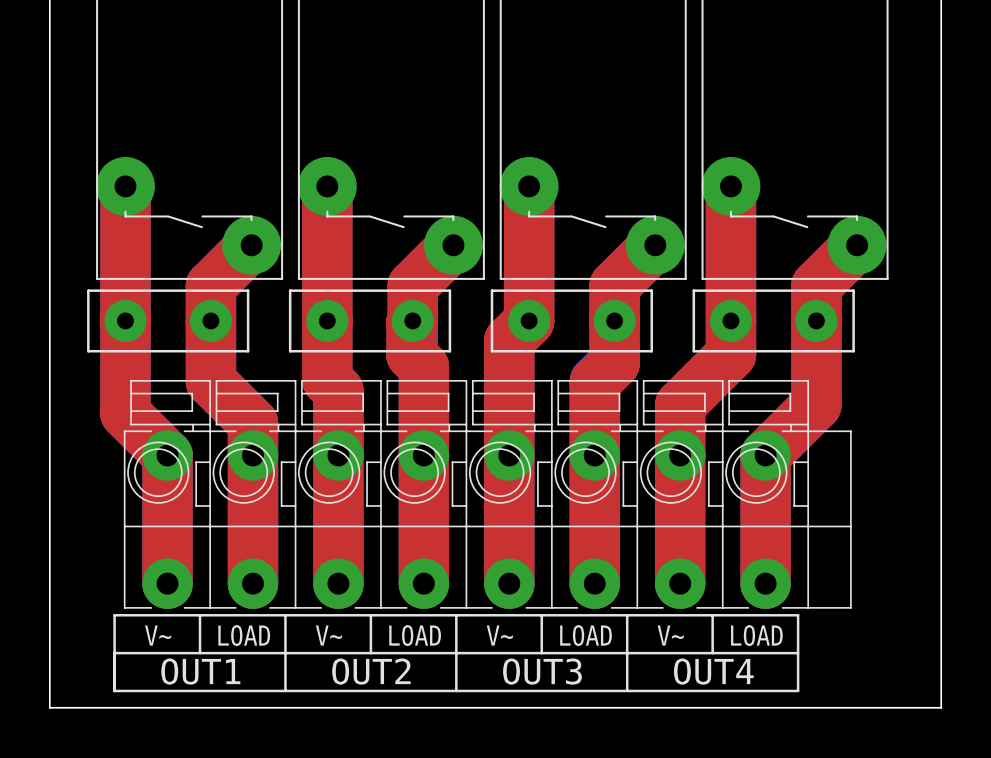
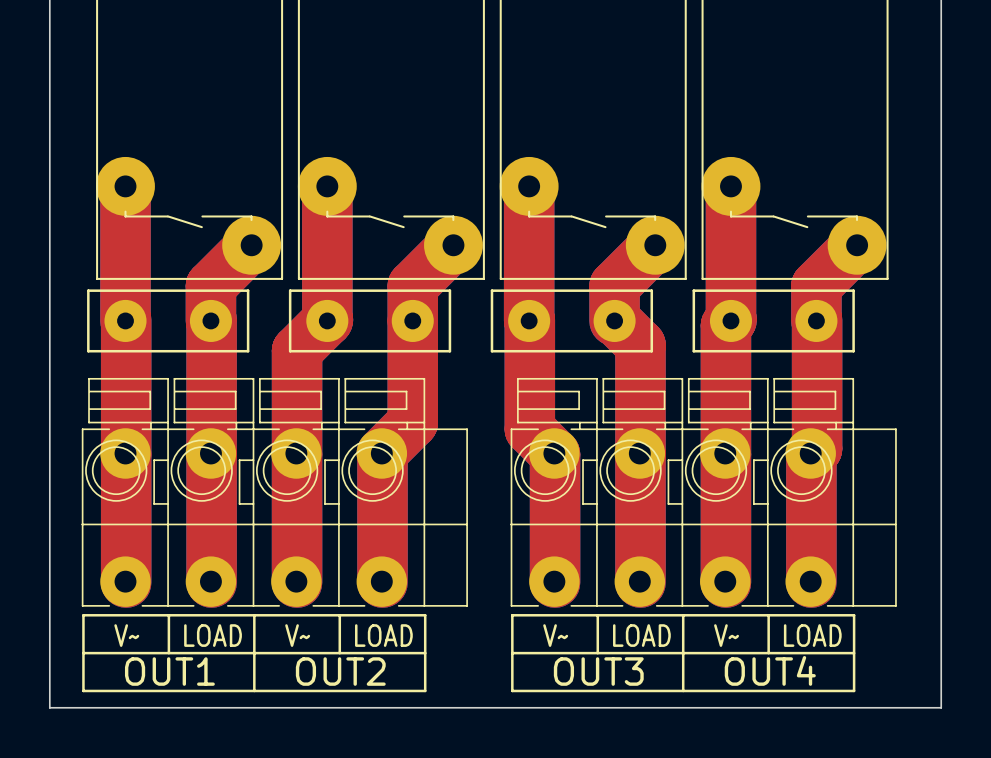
top track: none -> (126, 319) (126, 582)
top track: none -> (211, 319) (211, 582)
top track: none -> (328, 319) (297, 350) (297, 582)
top track: none -> (529, 319) (529, 429) (555, 454) (555, 582)
top track: none -> (615, 319) (640, 345) (640, 582)
top track: none -> (731, 319) (725, 325) (725, 582)
top track: none -> (817, 319) (817, 448) (811, 454) (811, 582)
top track: (125, 320) (125, 413) (167, 455) (167, 583) -> none
top track: (210, 320) (210, 381) (252, 423) (252, 583) -> none
top track: (327, 320) (327, 379) (338, 390) (338, 583) -> none
top track: (412, 320) (411, 354) (423, 367) (423, 583) -> (412, 320) (412, 422) (381, 453)
top track: (529, 320) (509, 340) (509, 583) -> none
top track: (614, 320) (614, 363) (594, 383) (594, 583) -> none
top track: (730, 320) (730, 354) (680, 405) (680, 583) -> none
top track: (816, 320) (816, 404) (765, 455) (765, 583) -> none
top track: none -> (382, 454) (382, 582)
part: none -> (274, 492)
part: none -> (703, 492)
part: (487, 494) -> none
line: (114, 615) (114, 690) -> (114, 615) (83, 615) (83, 690) (114, 690)
line: (200, 615) (200, 653) -> (168, 615) (168, 653)
line: (285, 615) (285, 690) -> (254, 615) (254, 690)
line: (370, 615) (370, 653) -> (339, 615) (339, 653)
line: (425, 615) (512, 615) -> (425, 615) (425, 690)
line: (456, 615) (456, 690) -> none
line: (541, 615) (541, 653) -> (597, 615) (597, 653)
line: (627, 615) (627, 690) -> (683, 615) (683, 690)
line: (712, 615) (712, 653) -> (768, 615) (768, 653)
line: (798, 615) (798, 690) -> (798, 615) (854, 615) (854, 690) (798, 690)
text position: V~ (158, 635) -> V~ (126, 635)
text position: LOAD (244, 635) -> LOAD (213, 635)
text position: V~ (329, 635) -> V~ (297, 635)
text position: LOAD (415, 635) -> LOAD (383, 635)
text position: V~ (499, 635) -> V~ (555, 635)
text position: LOAD (585, 635) -> LOAD (641, 635)
text position: V~ (670, 635) -> V~ (726, 635)
text position: LOAD (756, 635) -> LOAD (812, 635)
line: none -> (83, 653) (114, 653)
line: (425, 653) (512, 653) -> none
line: none -> (798, 653) (854, 653)
text position: OUT1 (200, 671) -> OUT1 (169, 671)
text position: OUT2 (371, 671) -> OUT2 (340, 671)
text position: OUT3 (542, 671) -> OUT3 (598, 671)
text position: OUT4 (713, 671) -> OUT4 (770, 670)
line: (425, 690) (512, 690) -> (512, 615) (512, 690)

